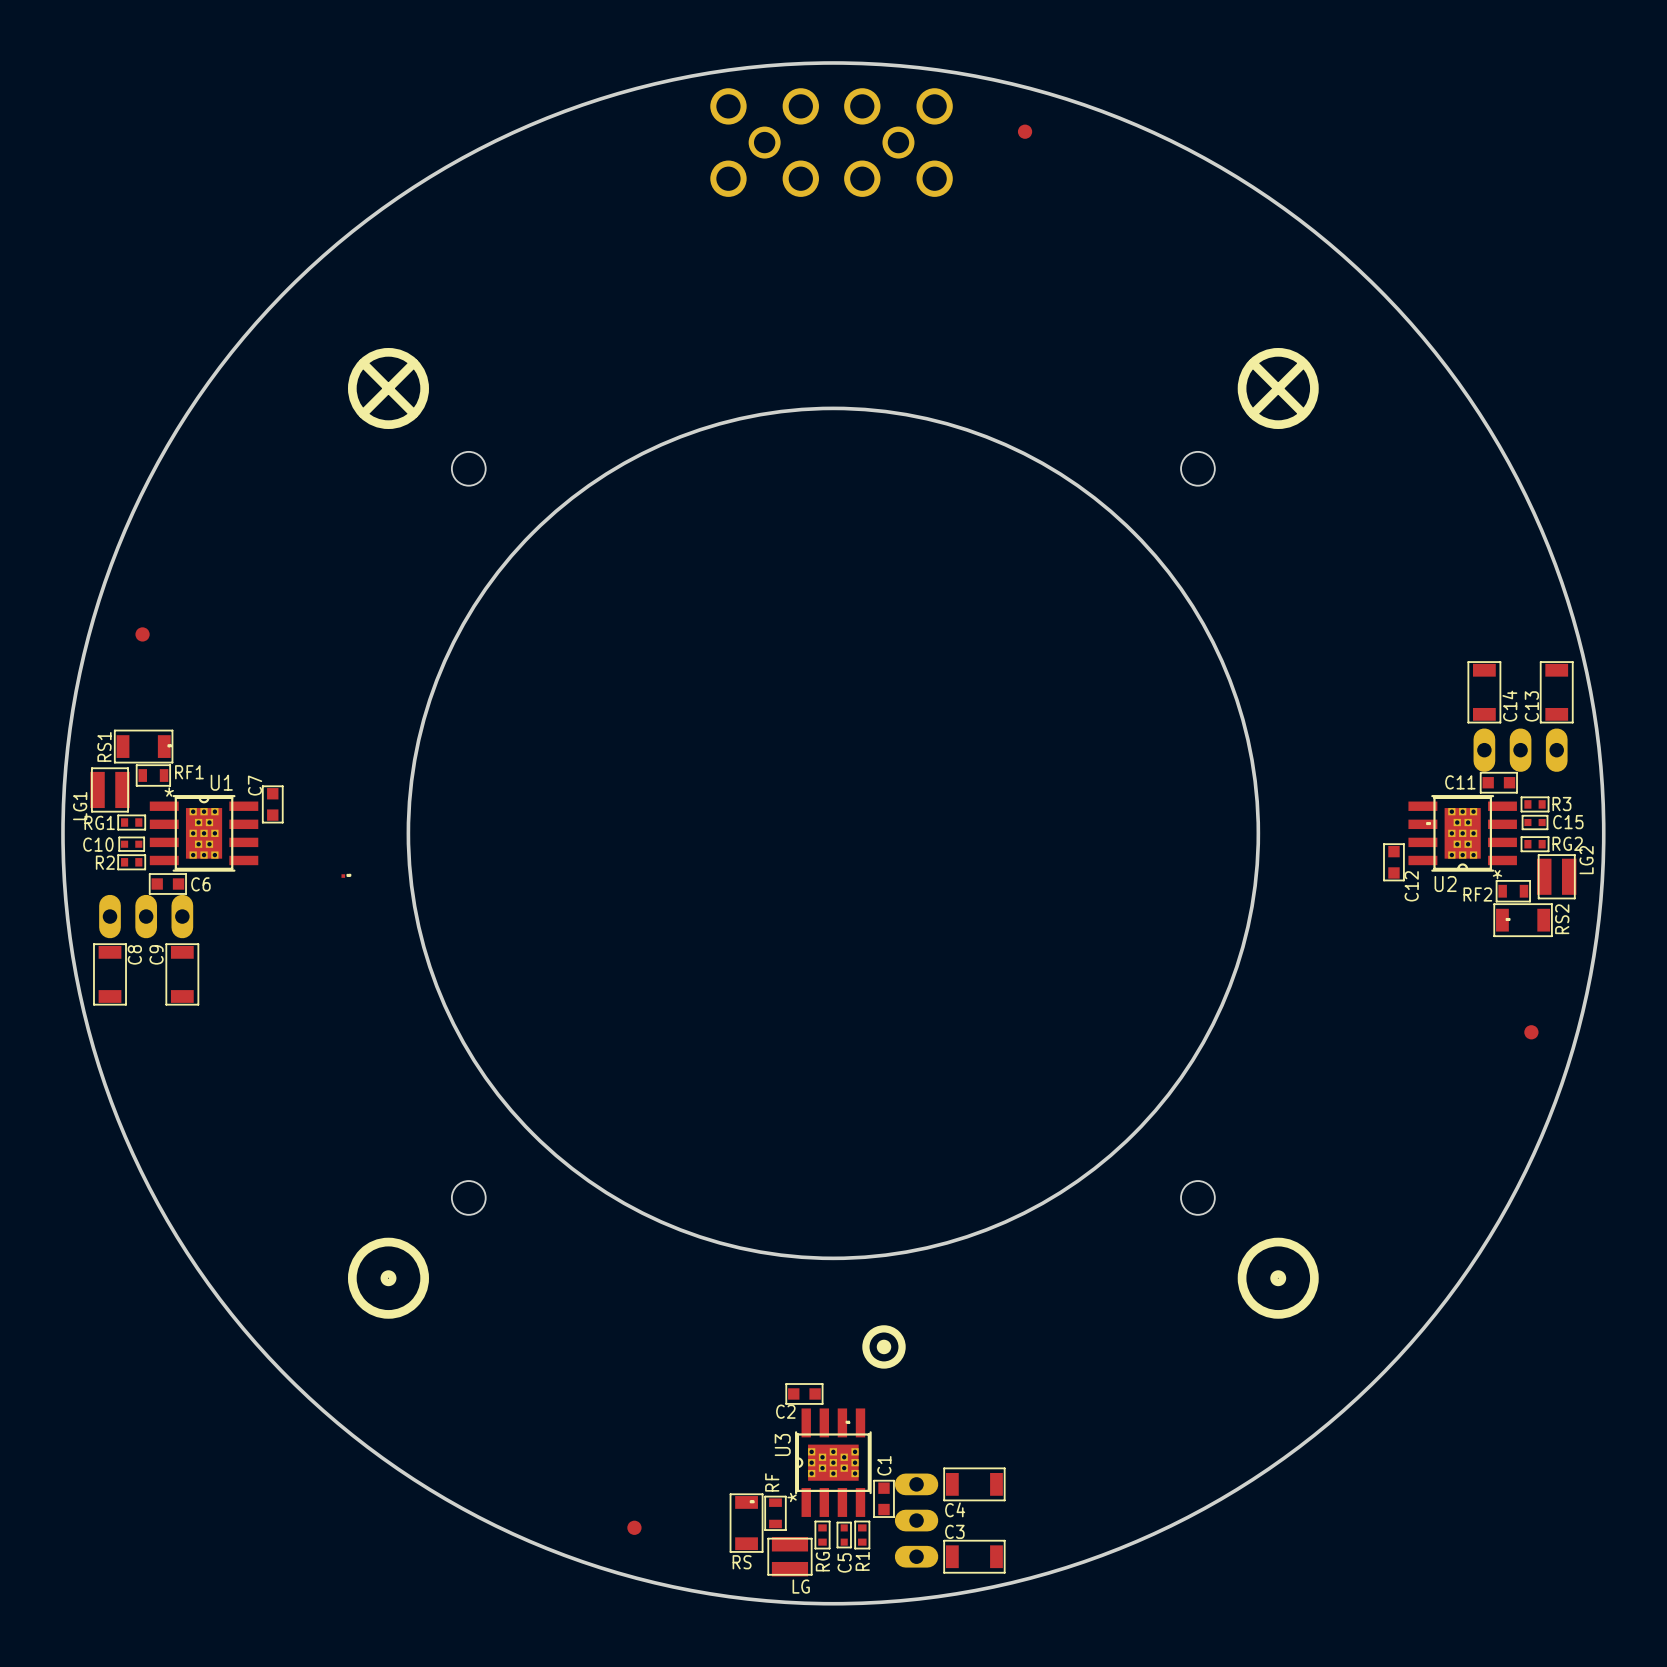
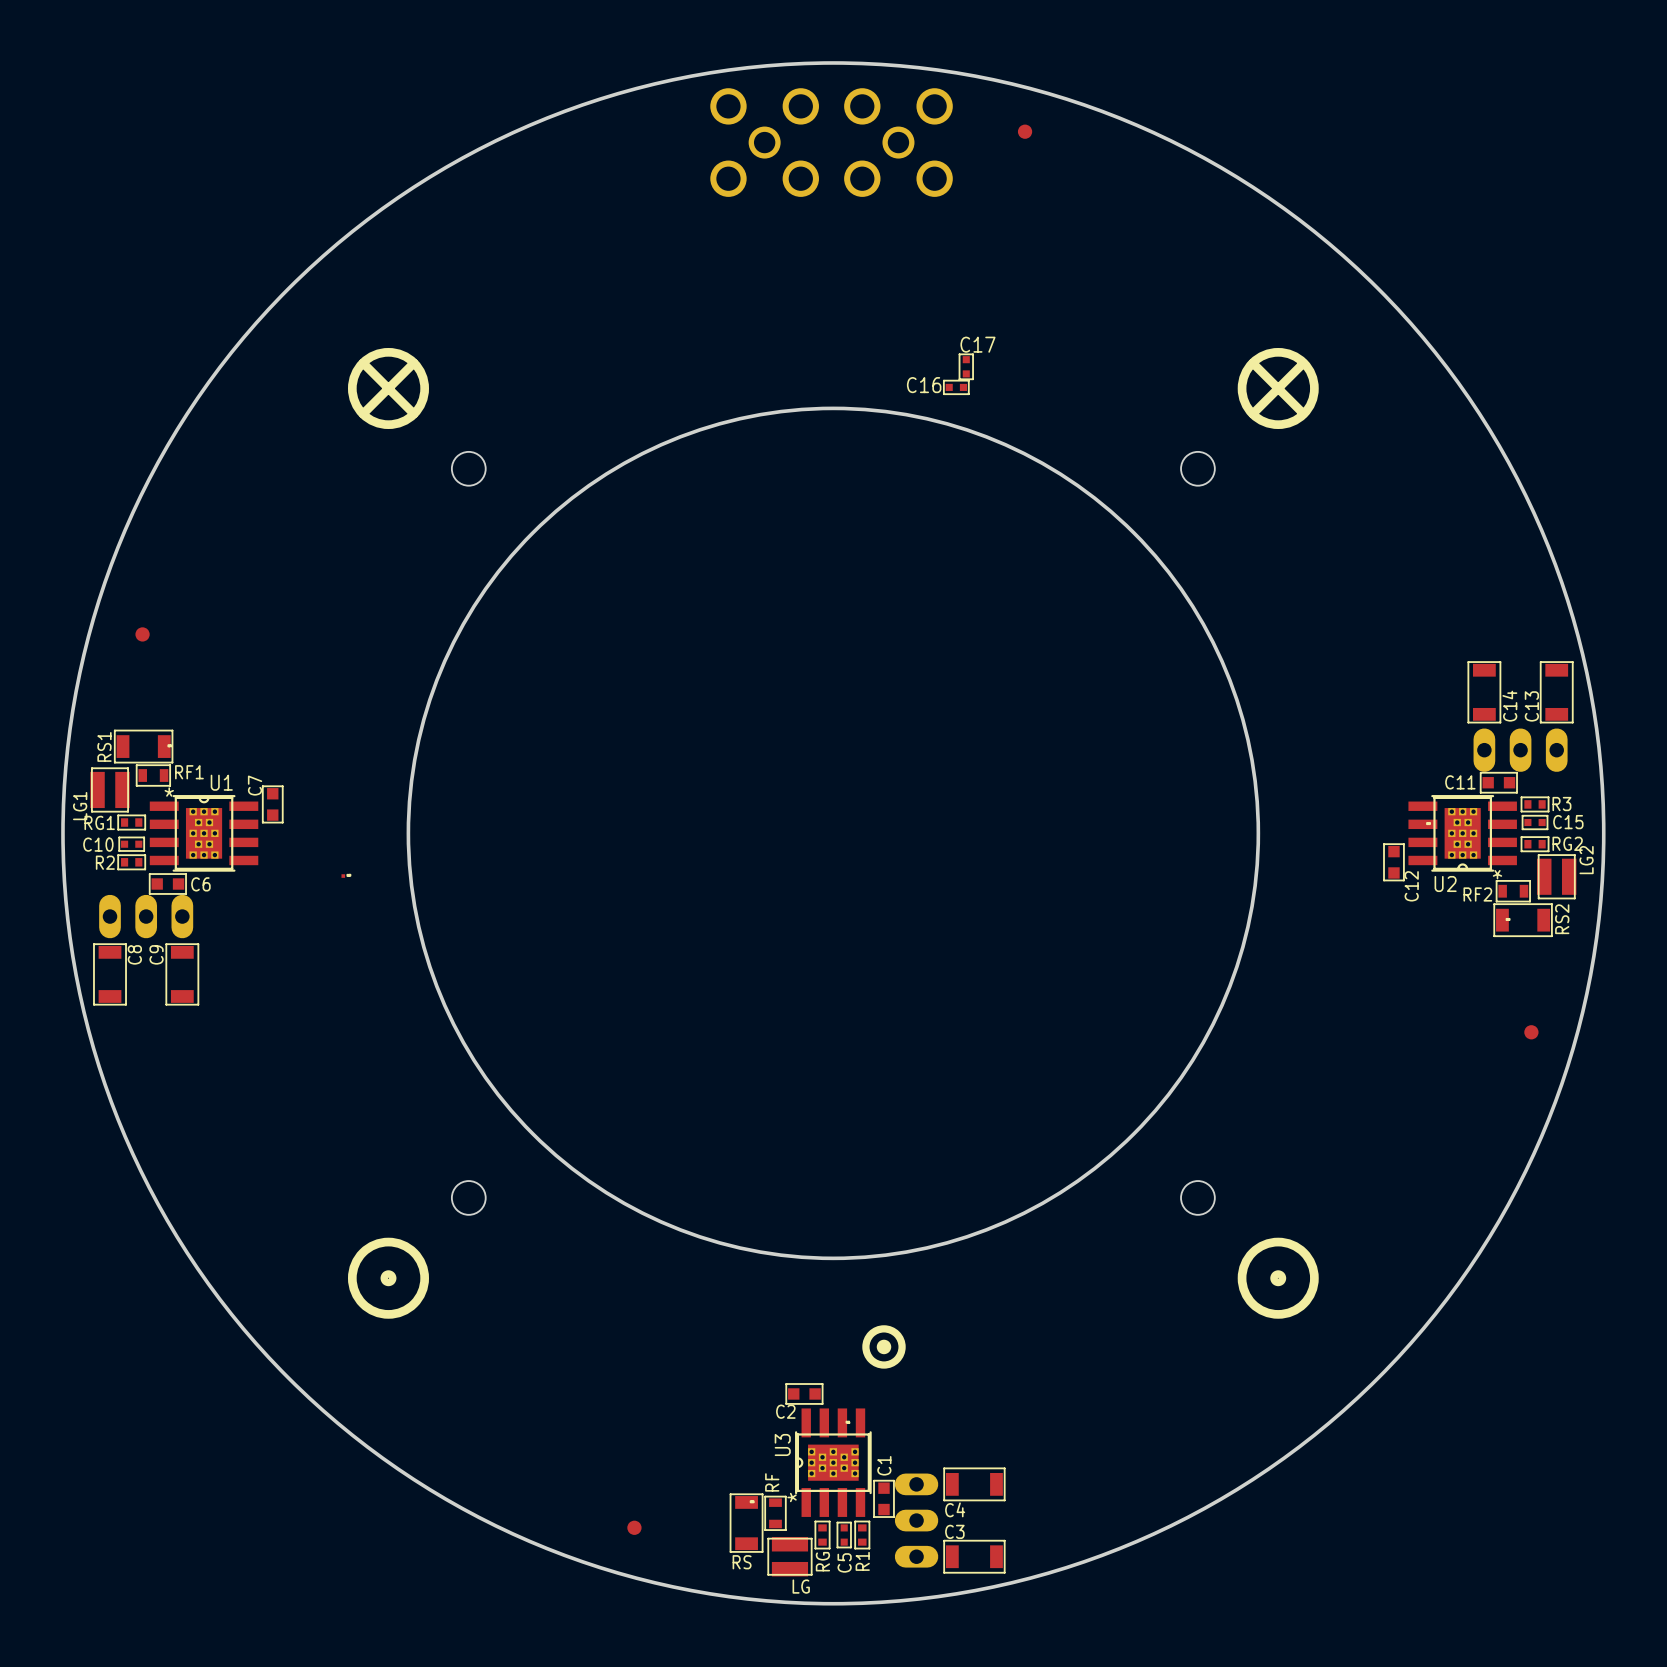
C17: none -> (966, 366)
C16: none -> (956, 387)

